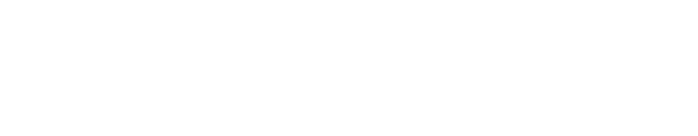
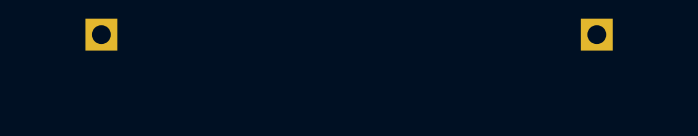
part: none -> (101, 34)
part: none -> (596, 34)

